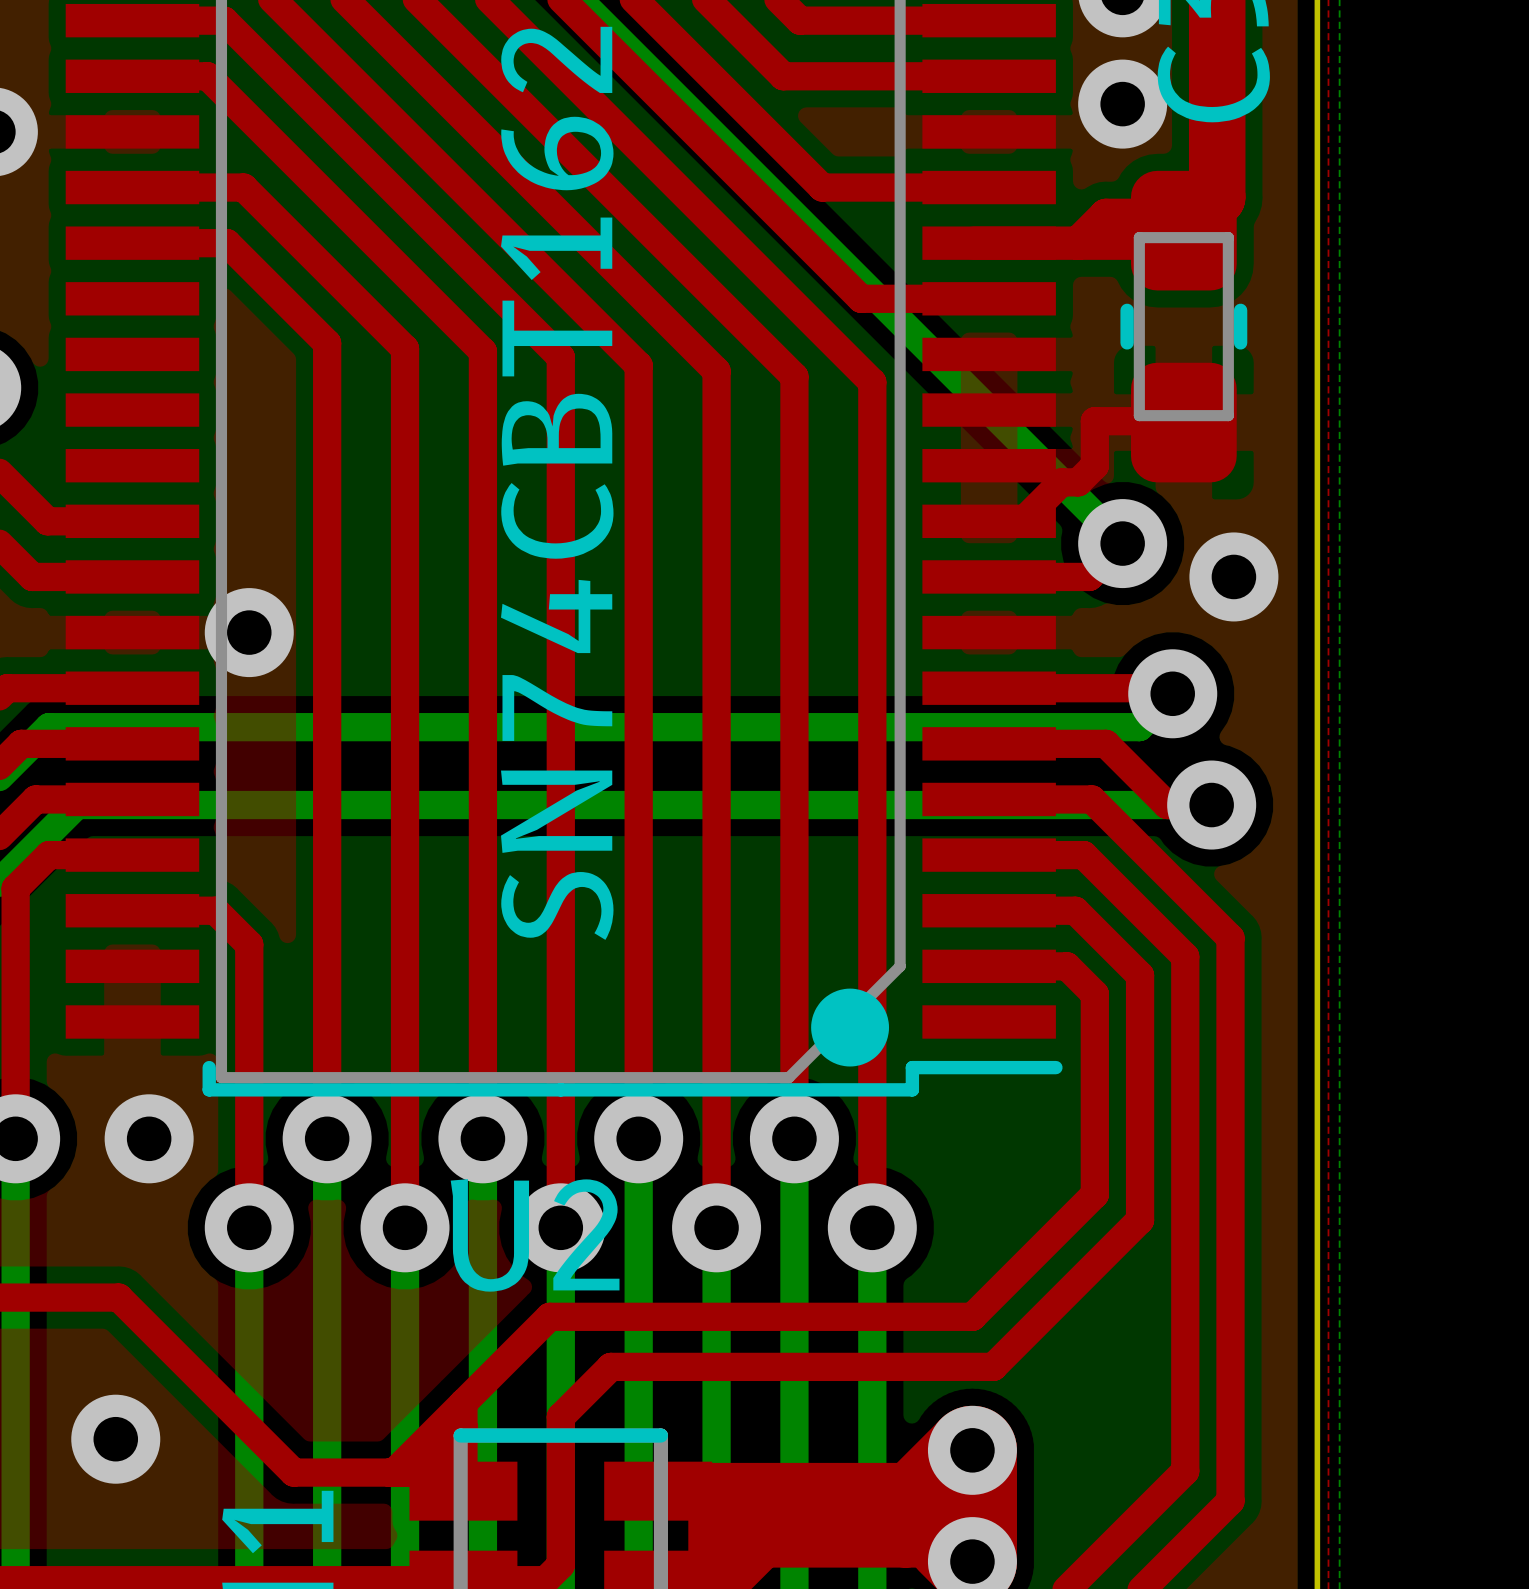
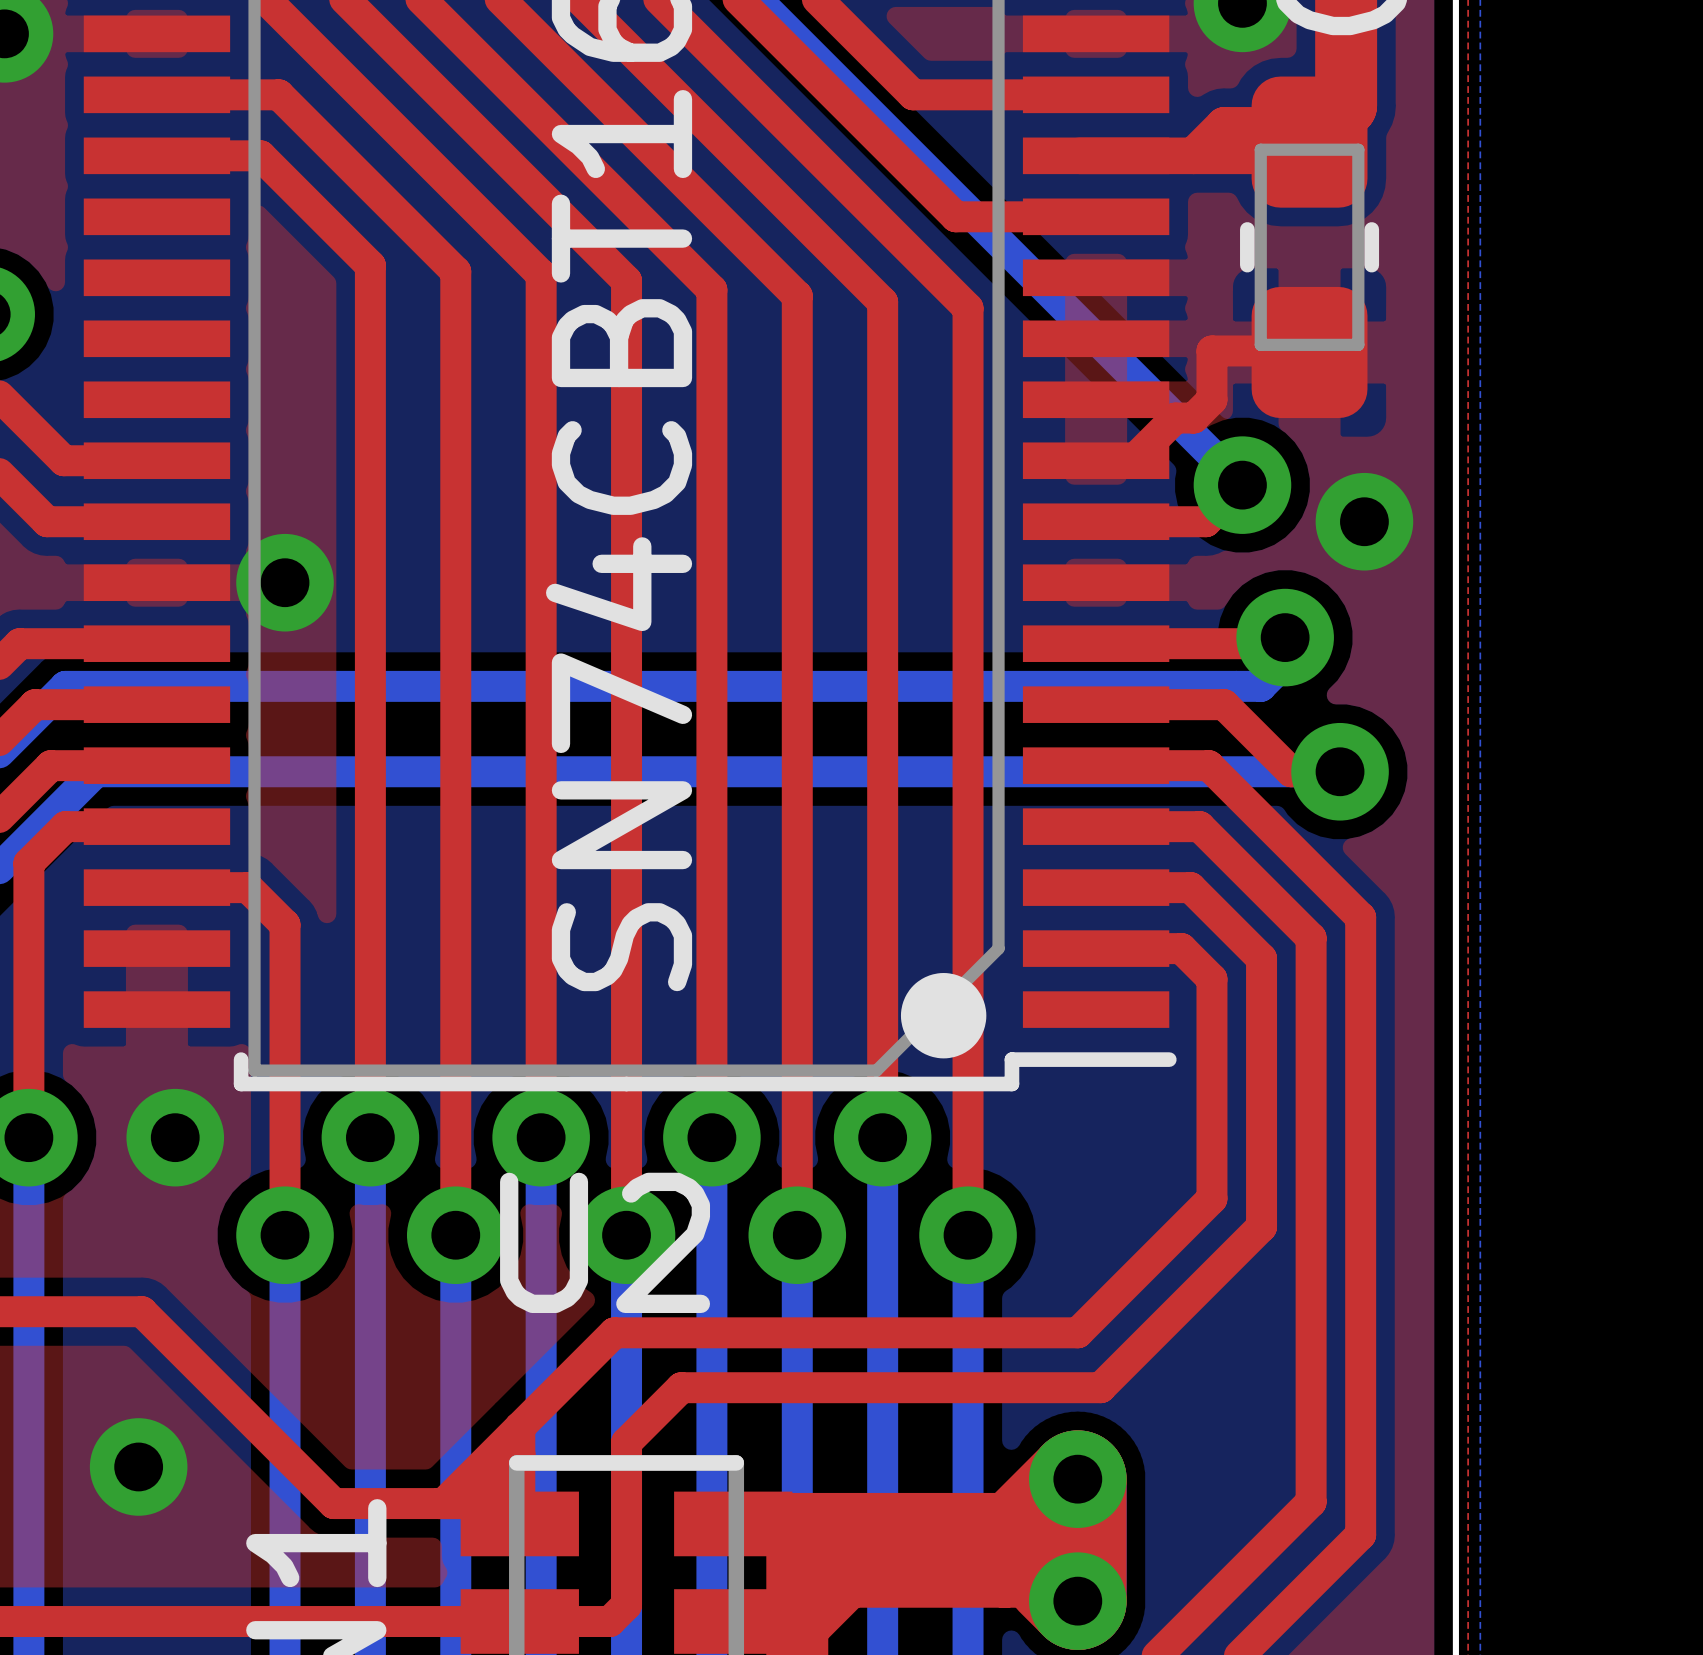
via position: (1172, 693) -> (1285, 637)

